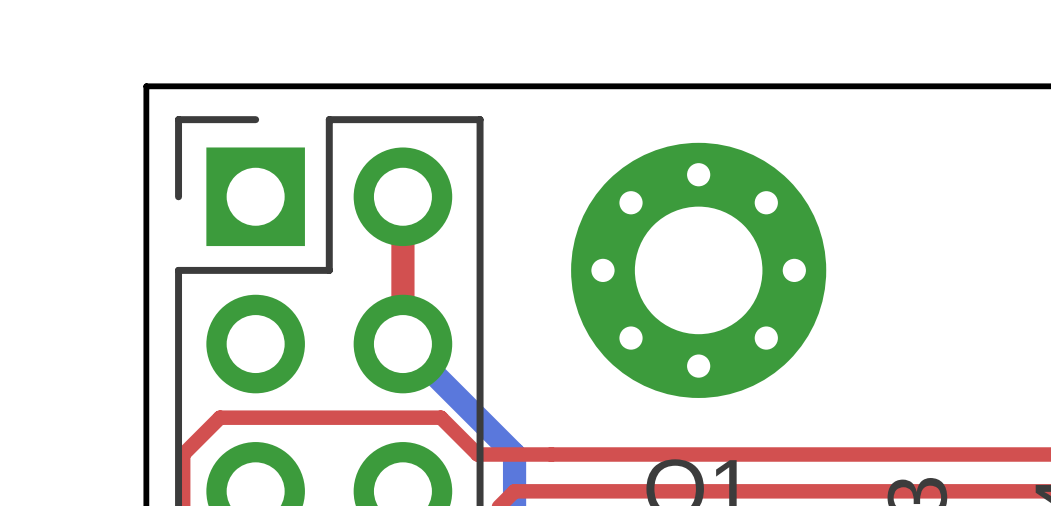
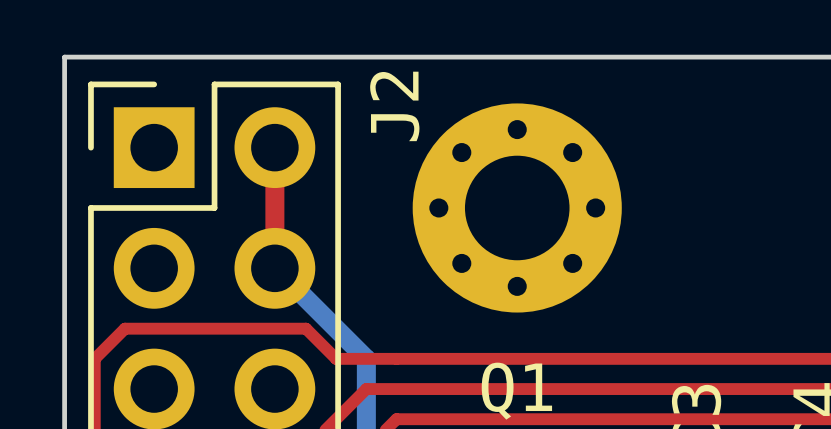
J2 name: none -> J2 (394, 106)

